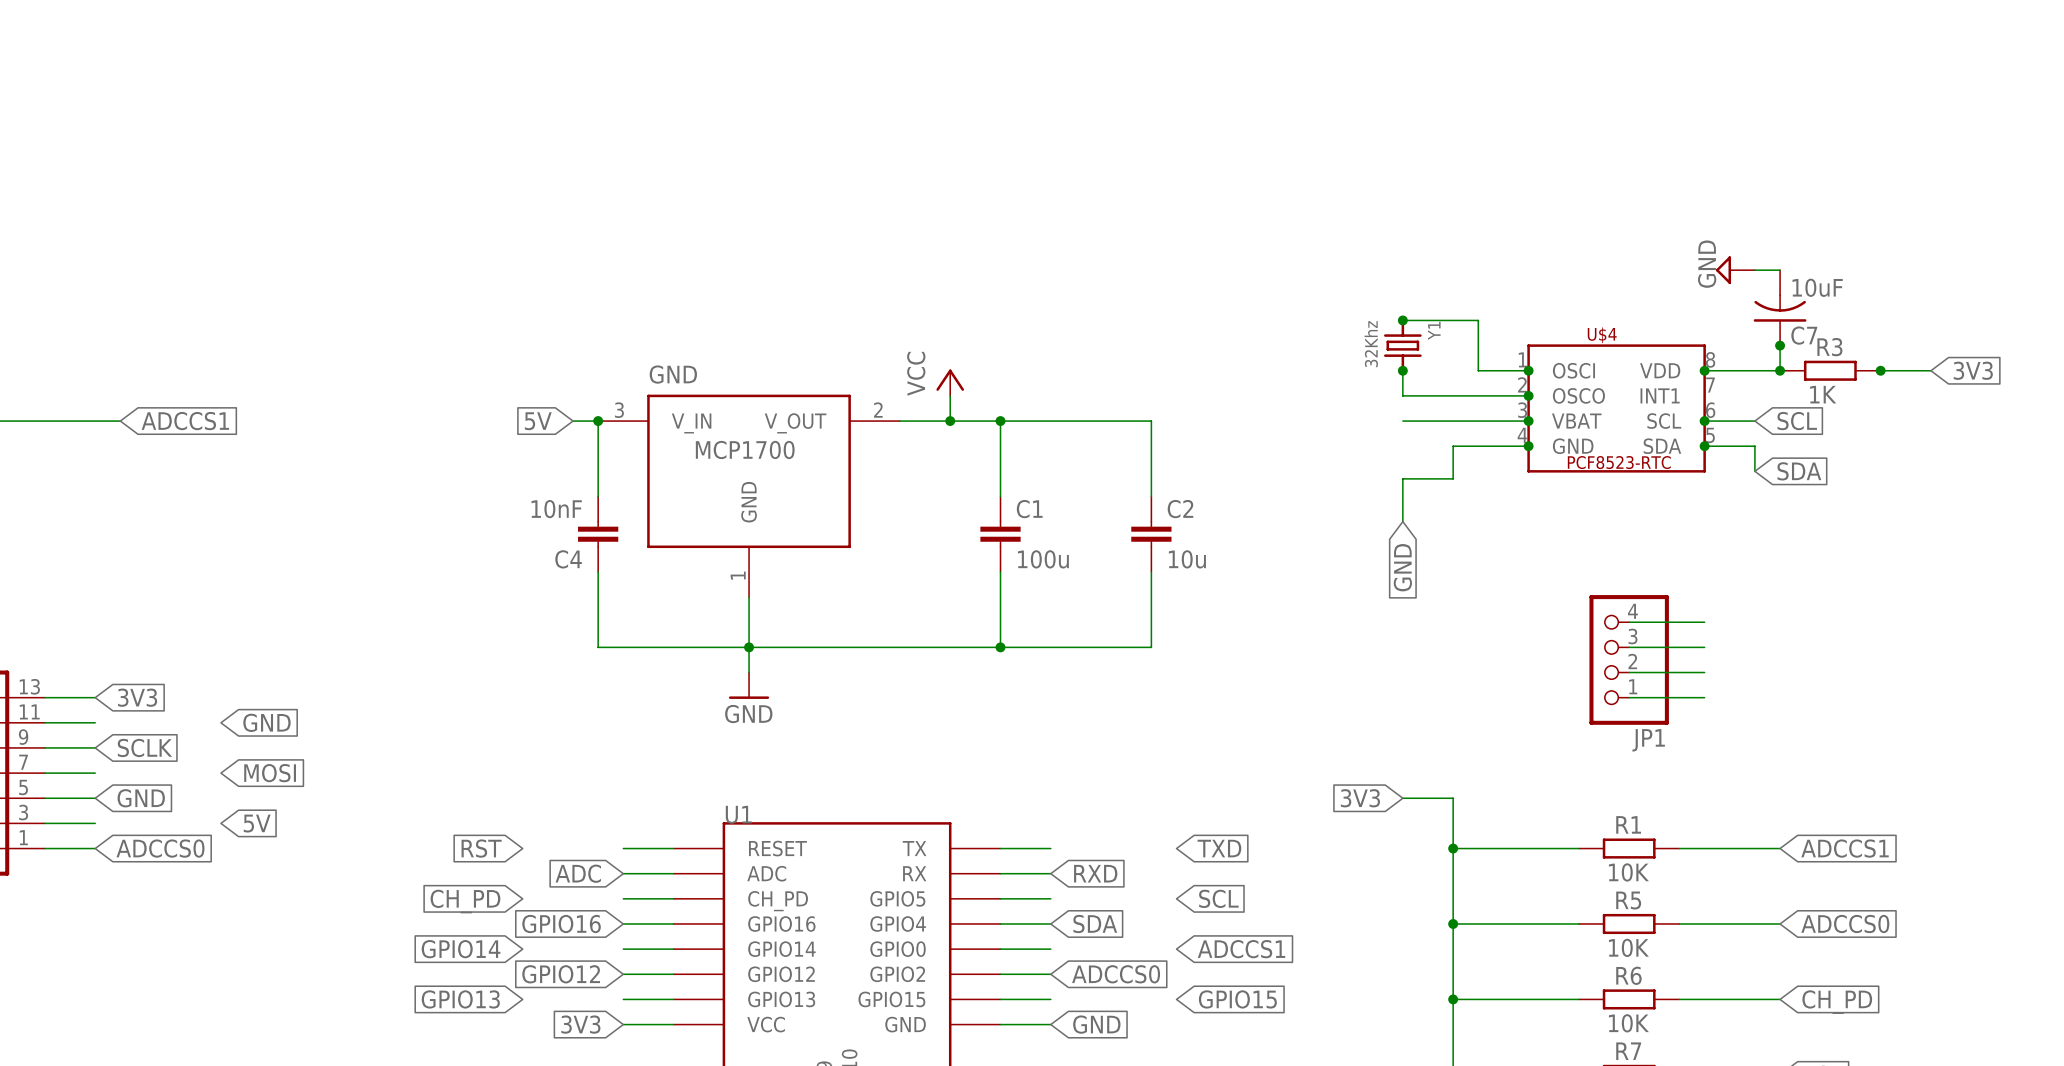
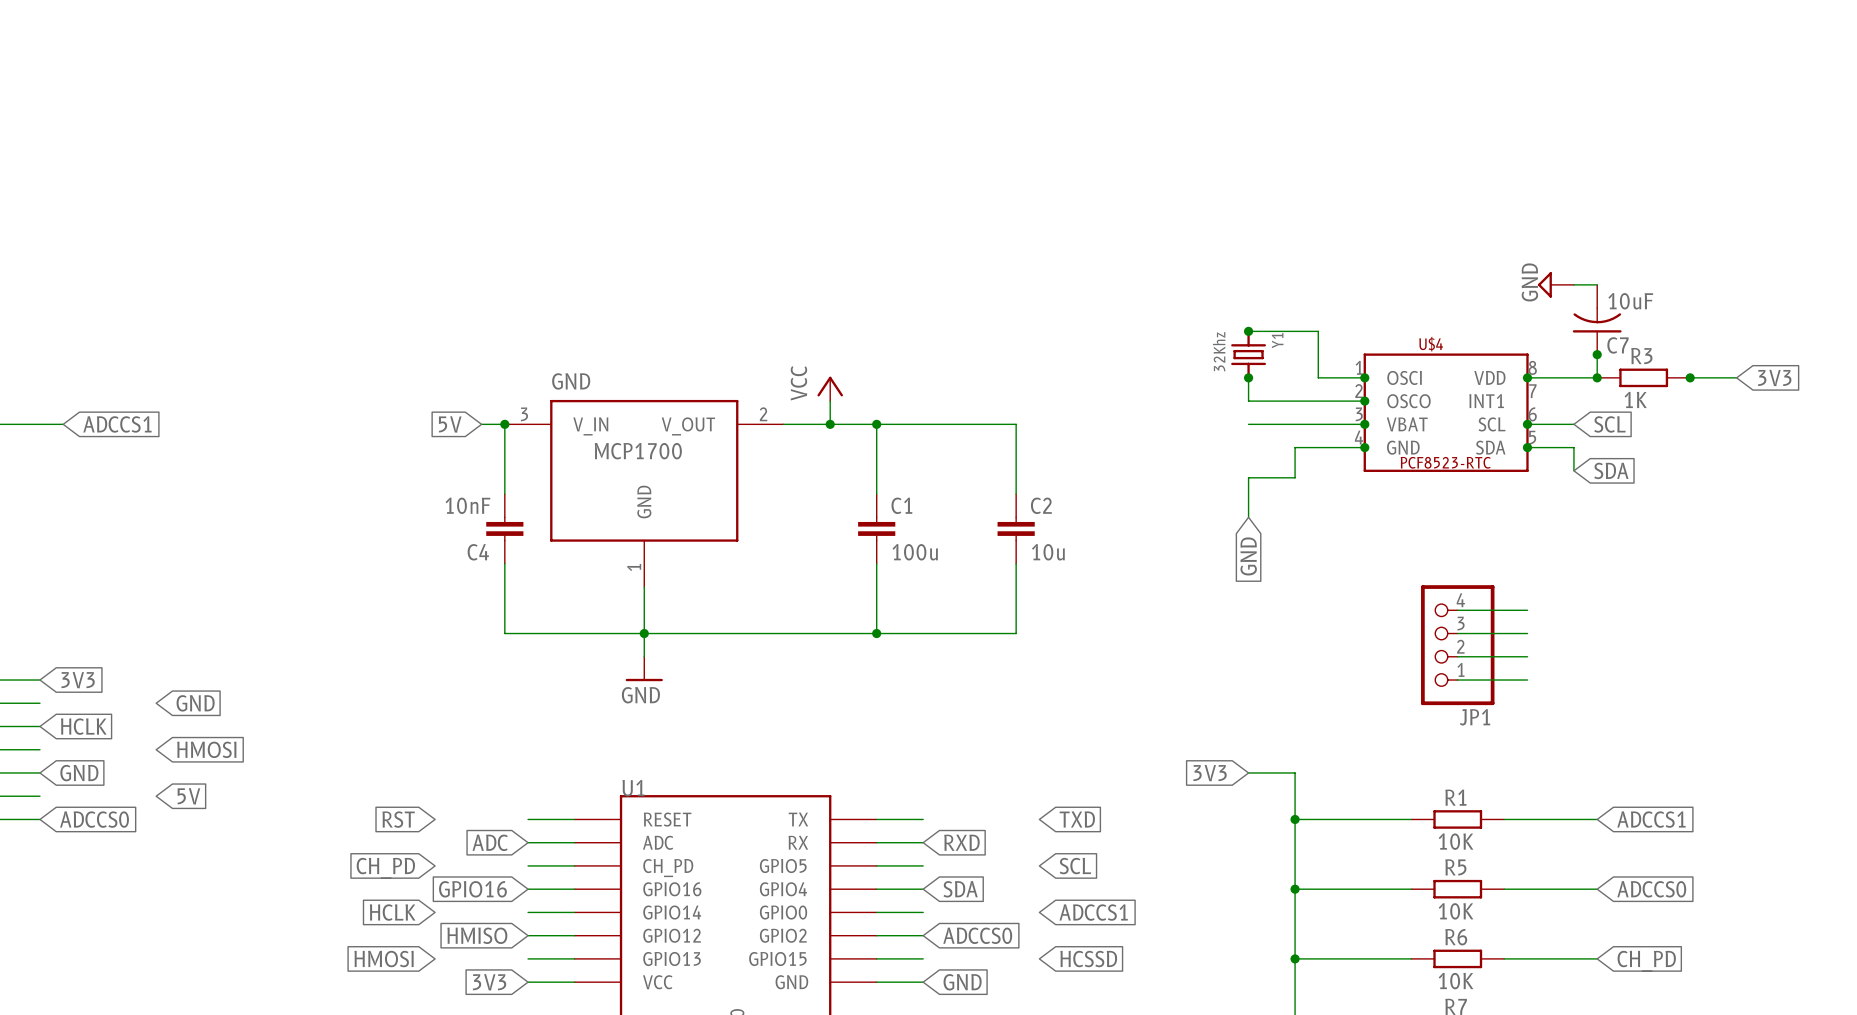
global label: SCLK (144, 747) -> HCLK (83, 726)
global label: MOSI (270, 773) -> HMOSI (206, 749)
global label: GPIO14 (461, 949) -> HCLK (392, 912)
global label: GPIO12 (561, 974) -> HMISO (477, 935)
global label: GPIO13 (460, 999) -> HMOSI (384, 959)
global label: GPIO15 (1237, 999) -> HCSSD (1088, 959)

